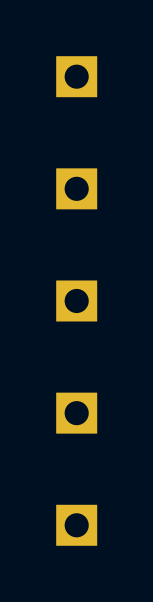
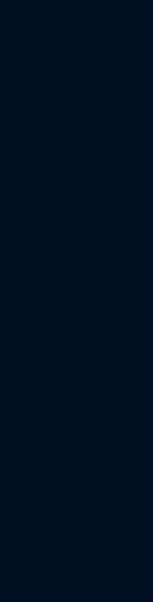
part: (76, 76) -> none
part: (76, 188) -> none
part: (76, 300) -> none
part: (76, 413) -> none
part: (76, 525) -> none

